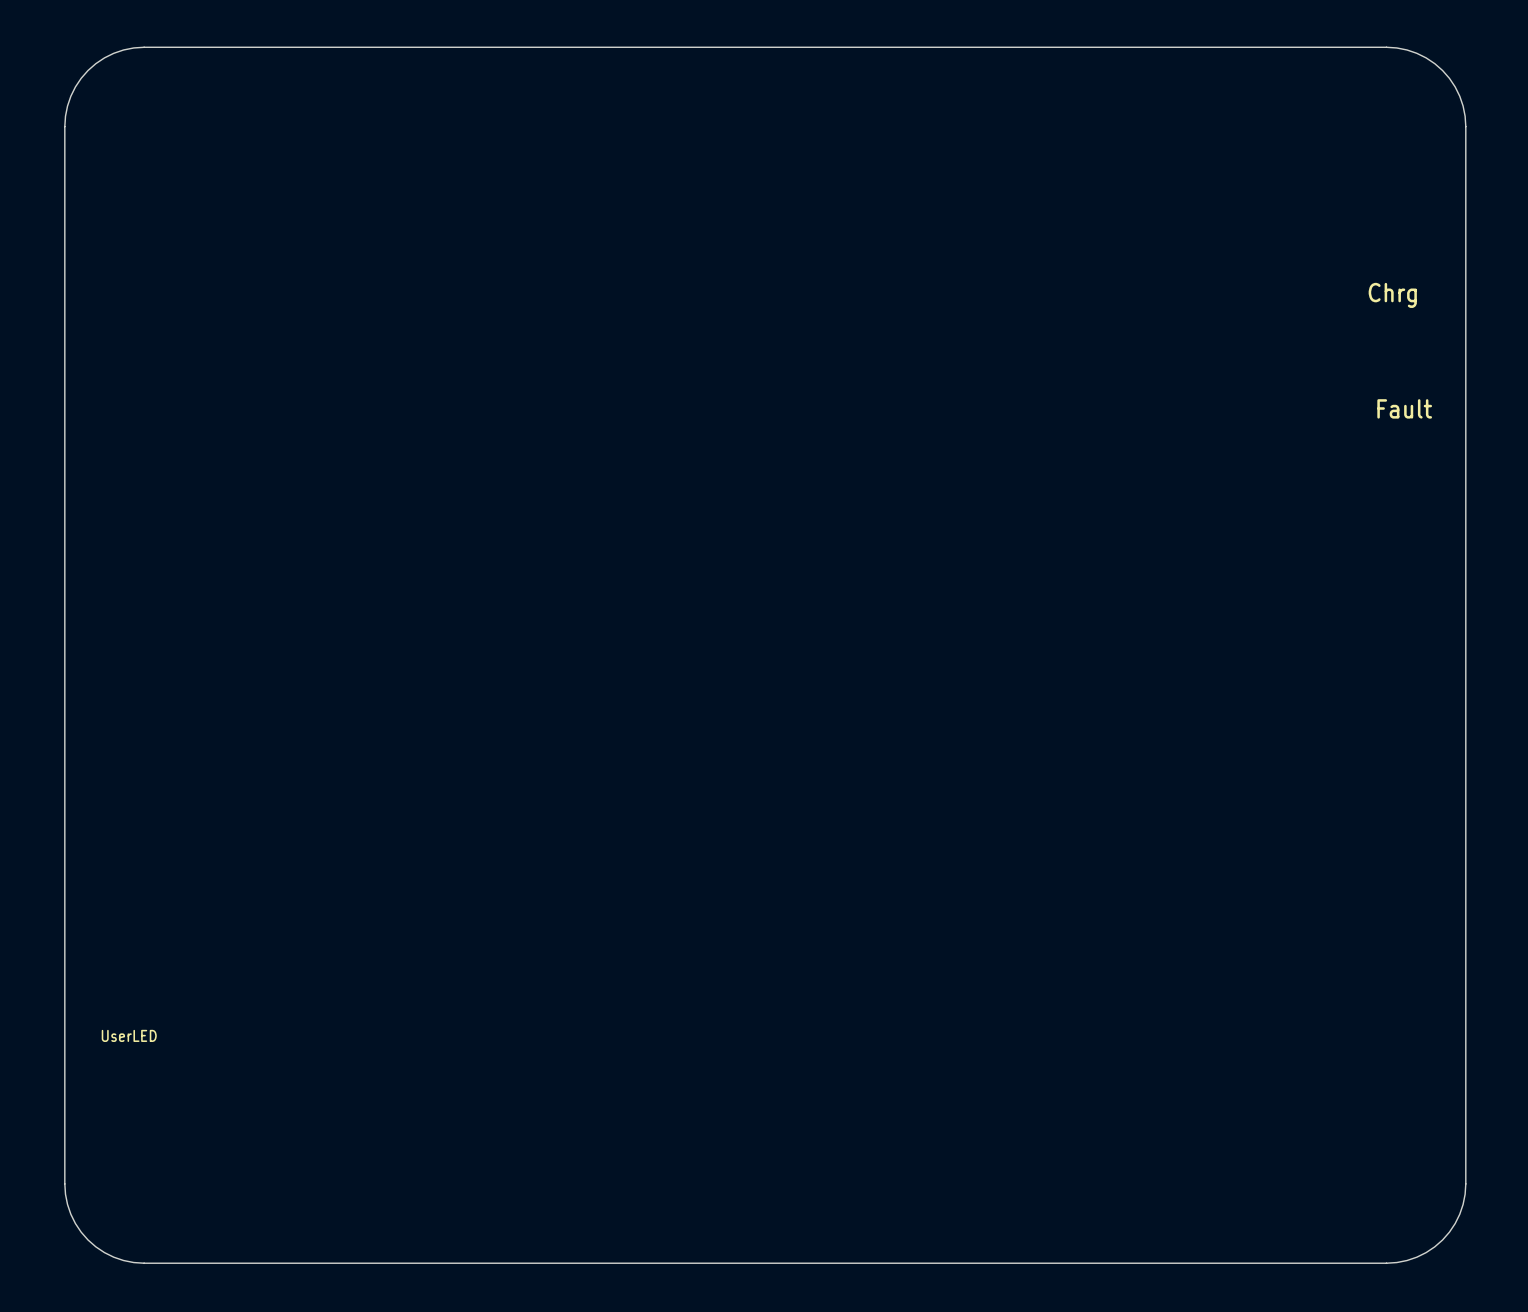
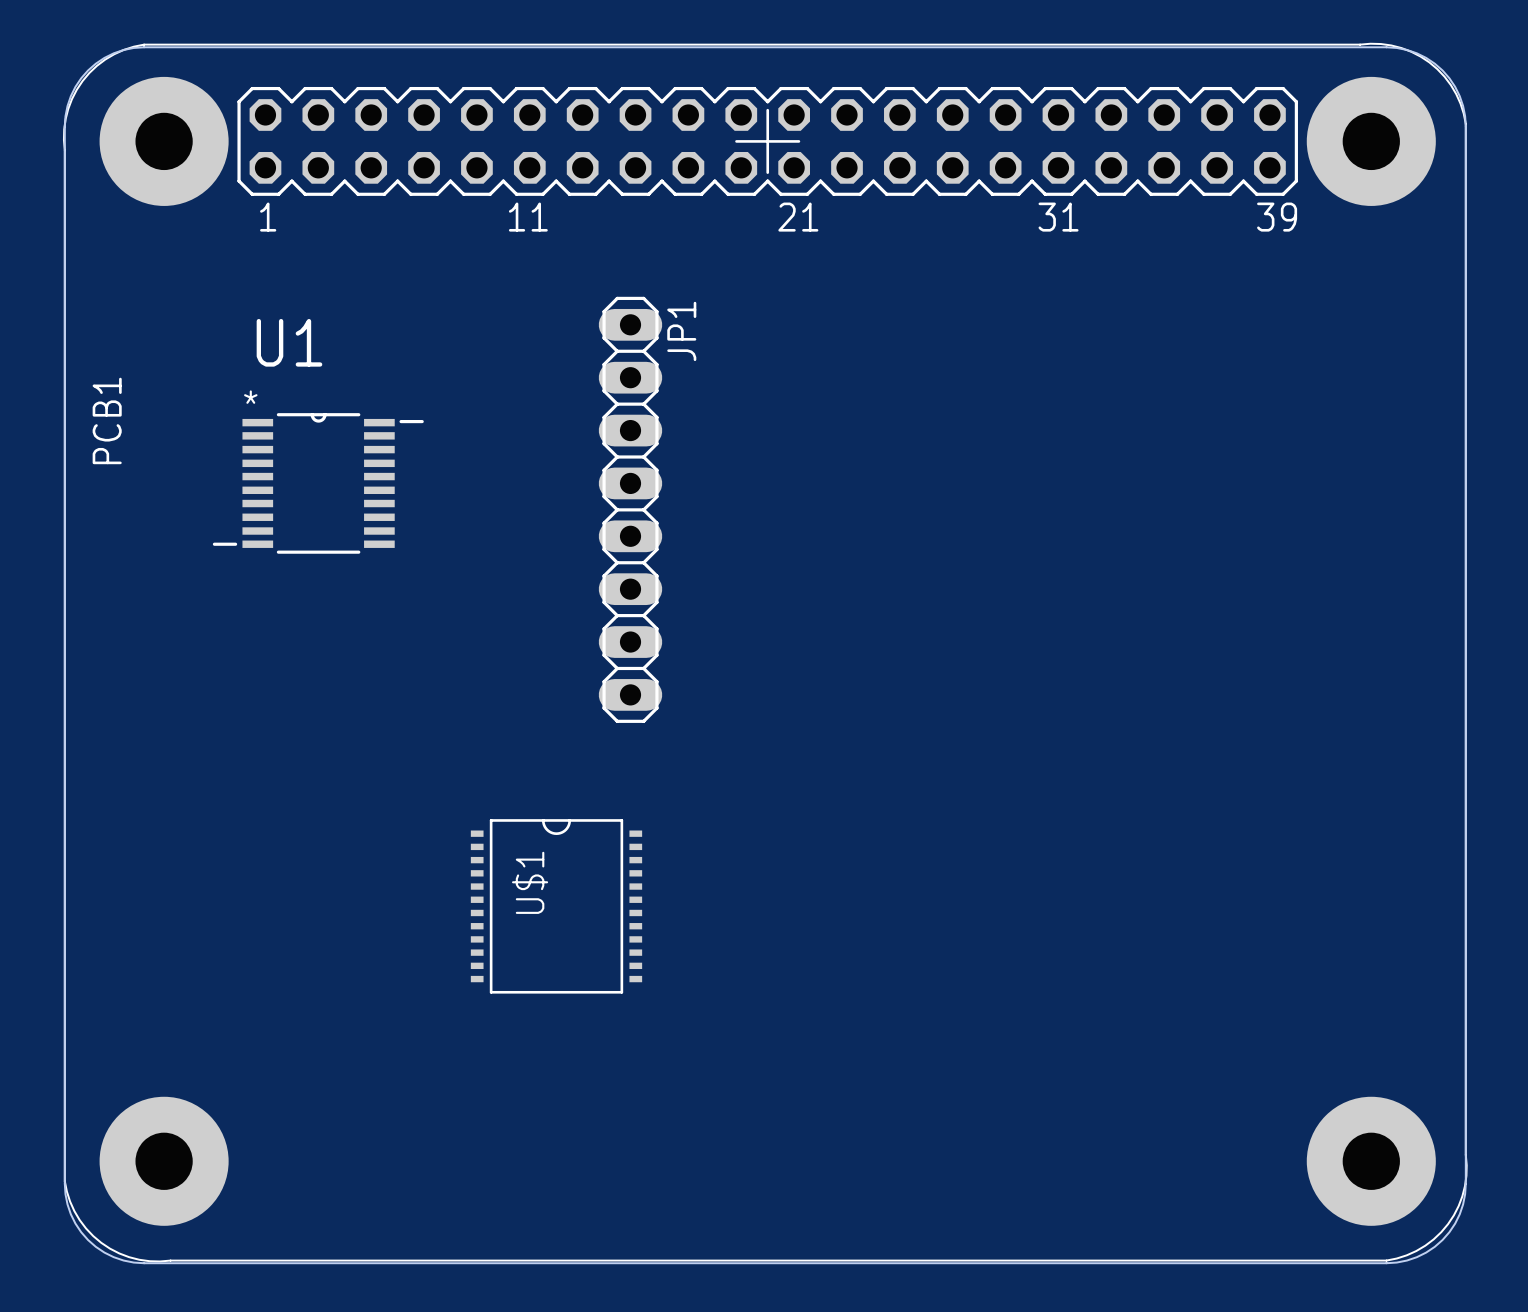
text: Chrg (1392, 295) -> none
text: Fault (1404, 408) -> none
U1: none -> (318, 483)
JP1: none -> (630, 509)
PCB1: none -> (765, 652)
U$1: none -> (556, 906)
text: UserLED (129, 1035) -> none

